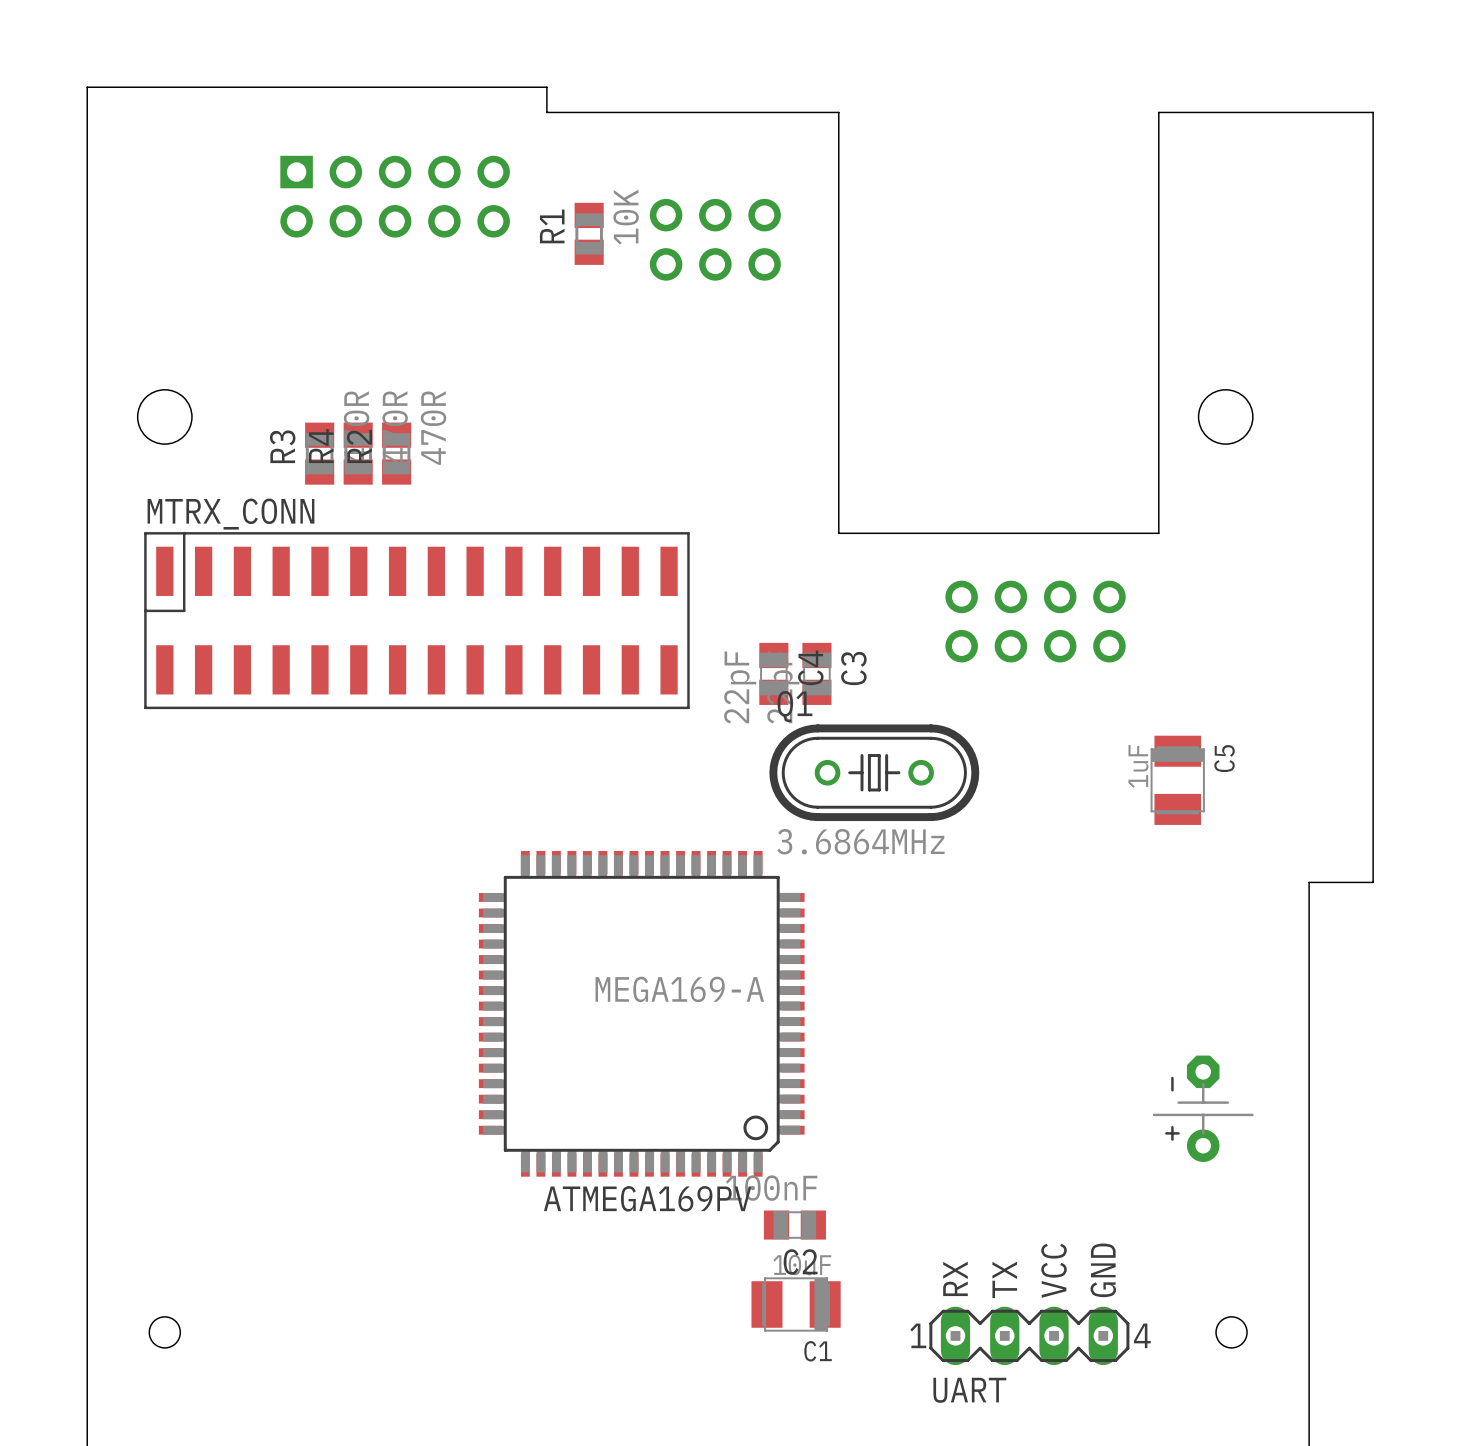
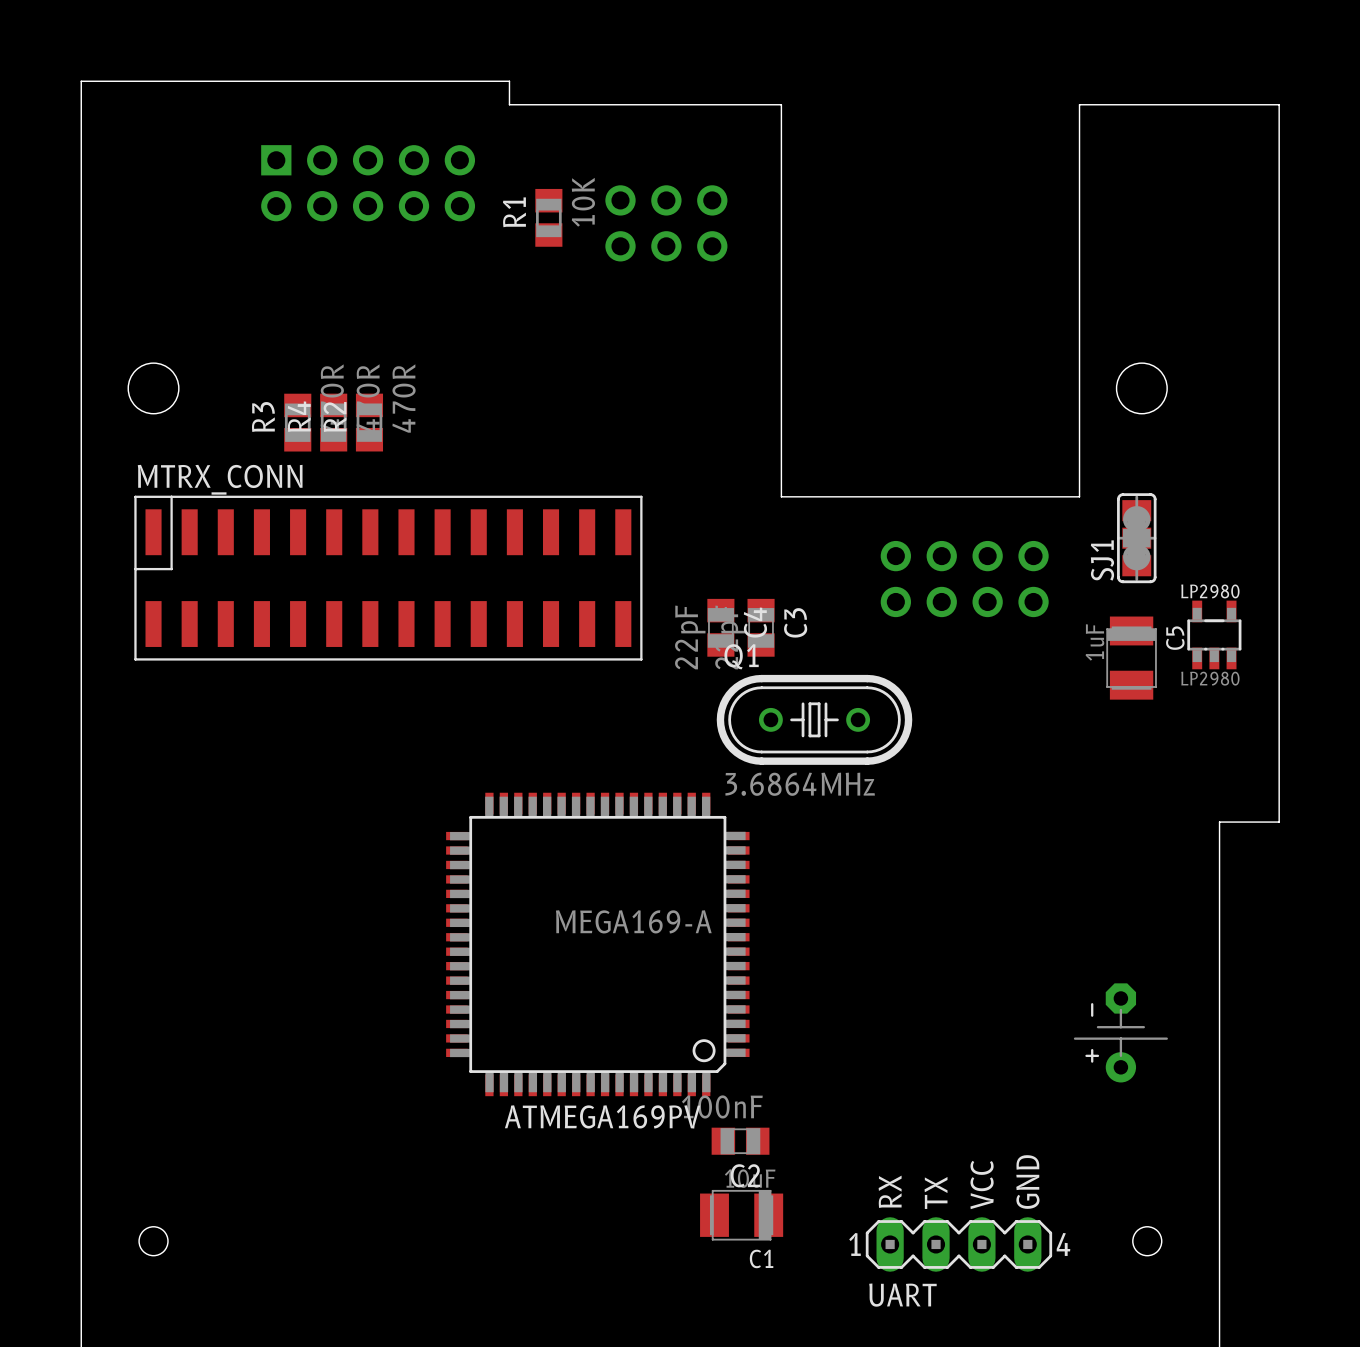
SJ1: none -> (1136, 538)
LP2980: none -> LP2980 (1214, 634)
C5 position: (1177, 780) -> (1131, 658)

